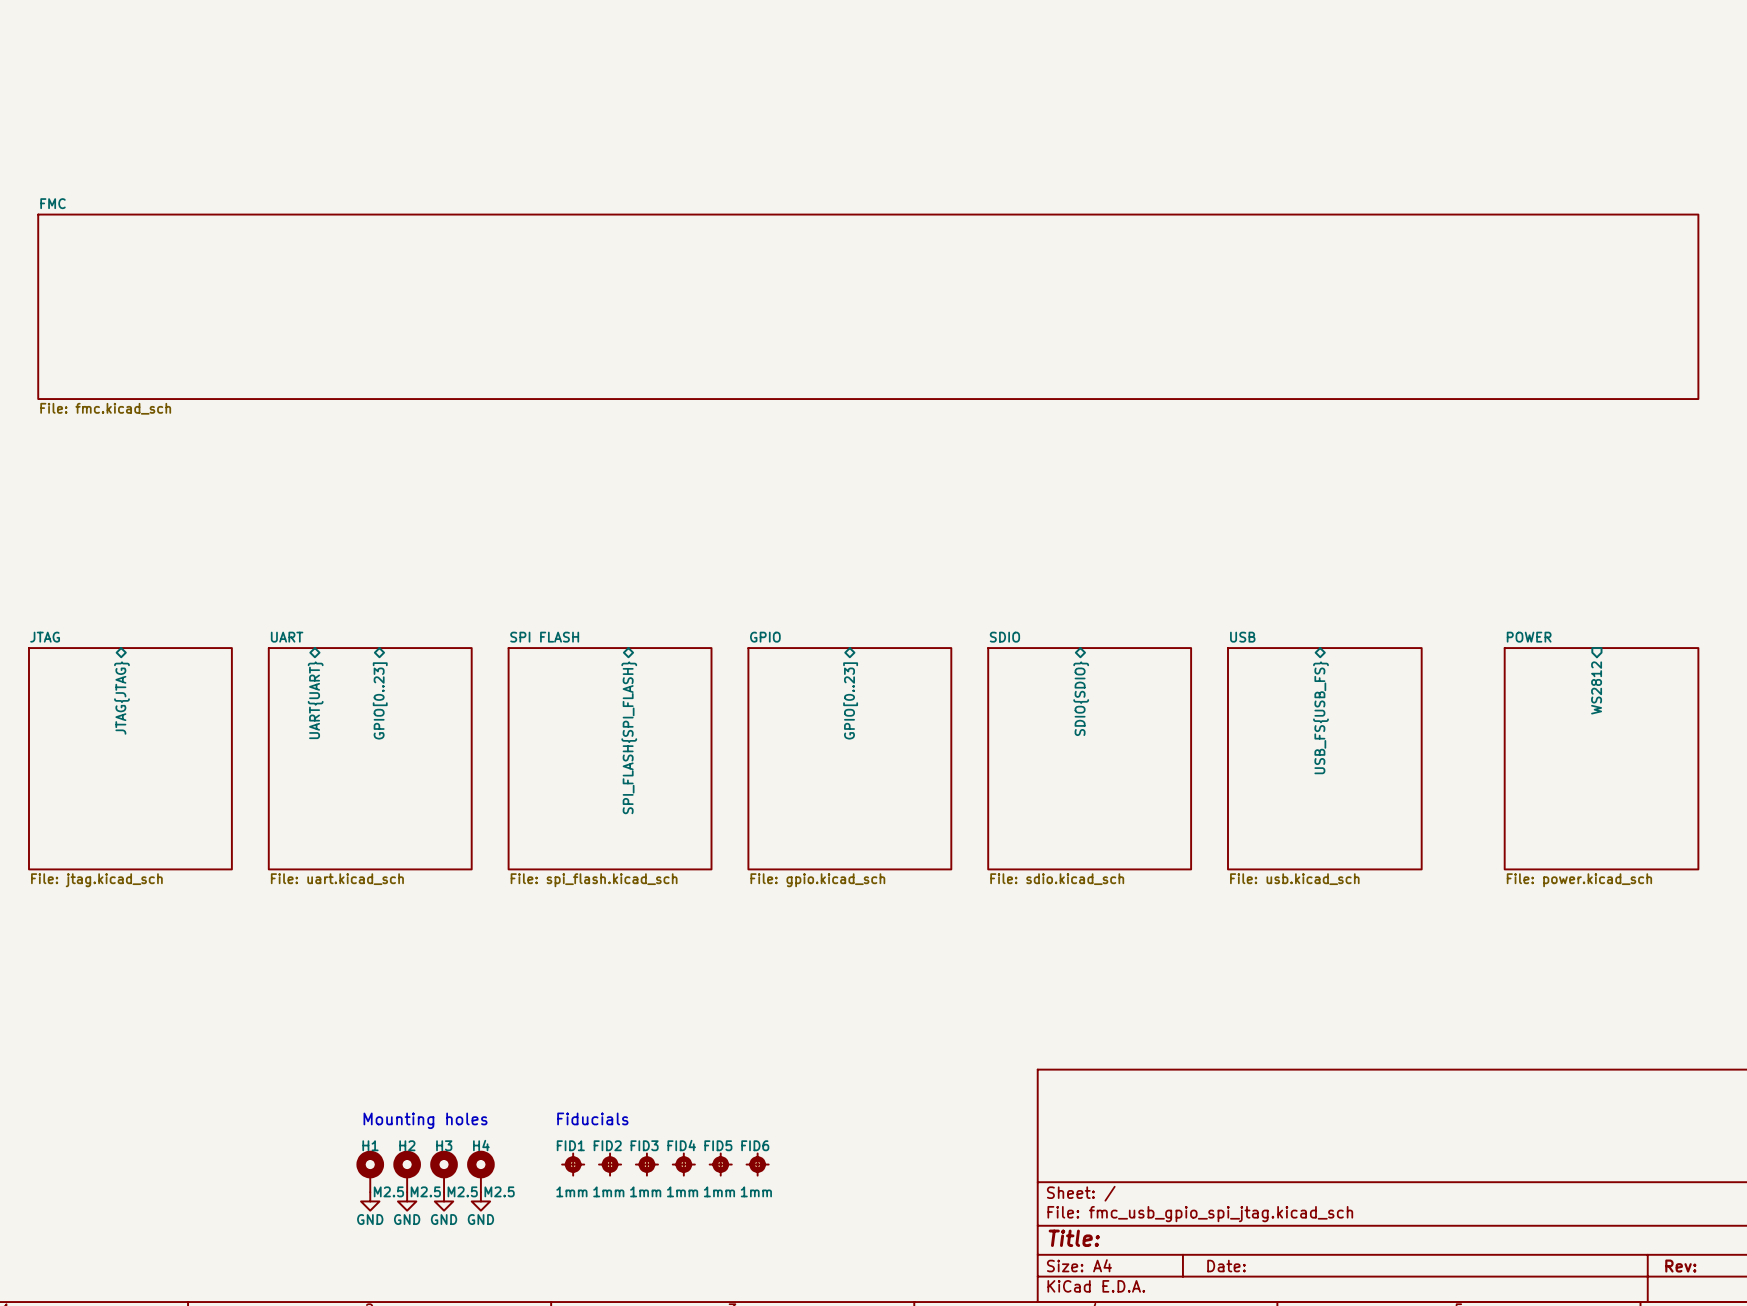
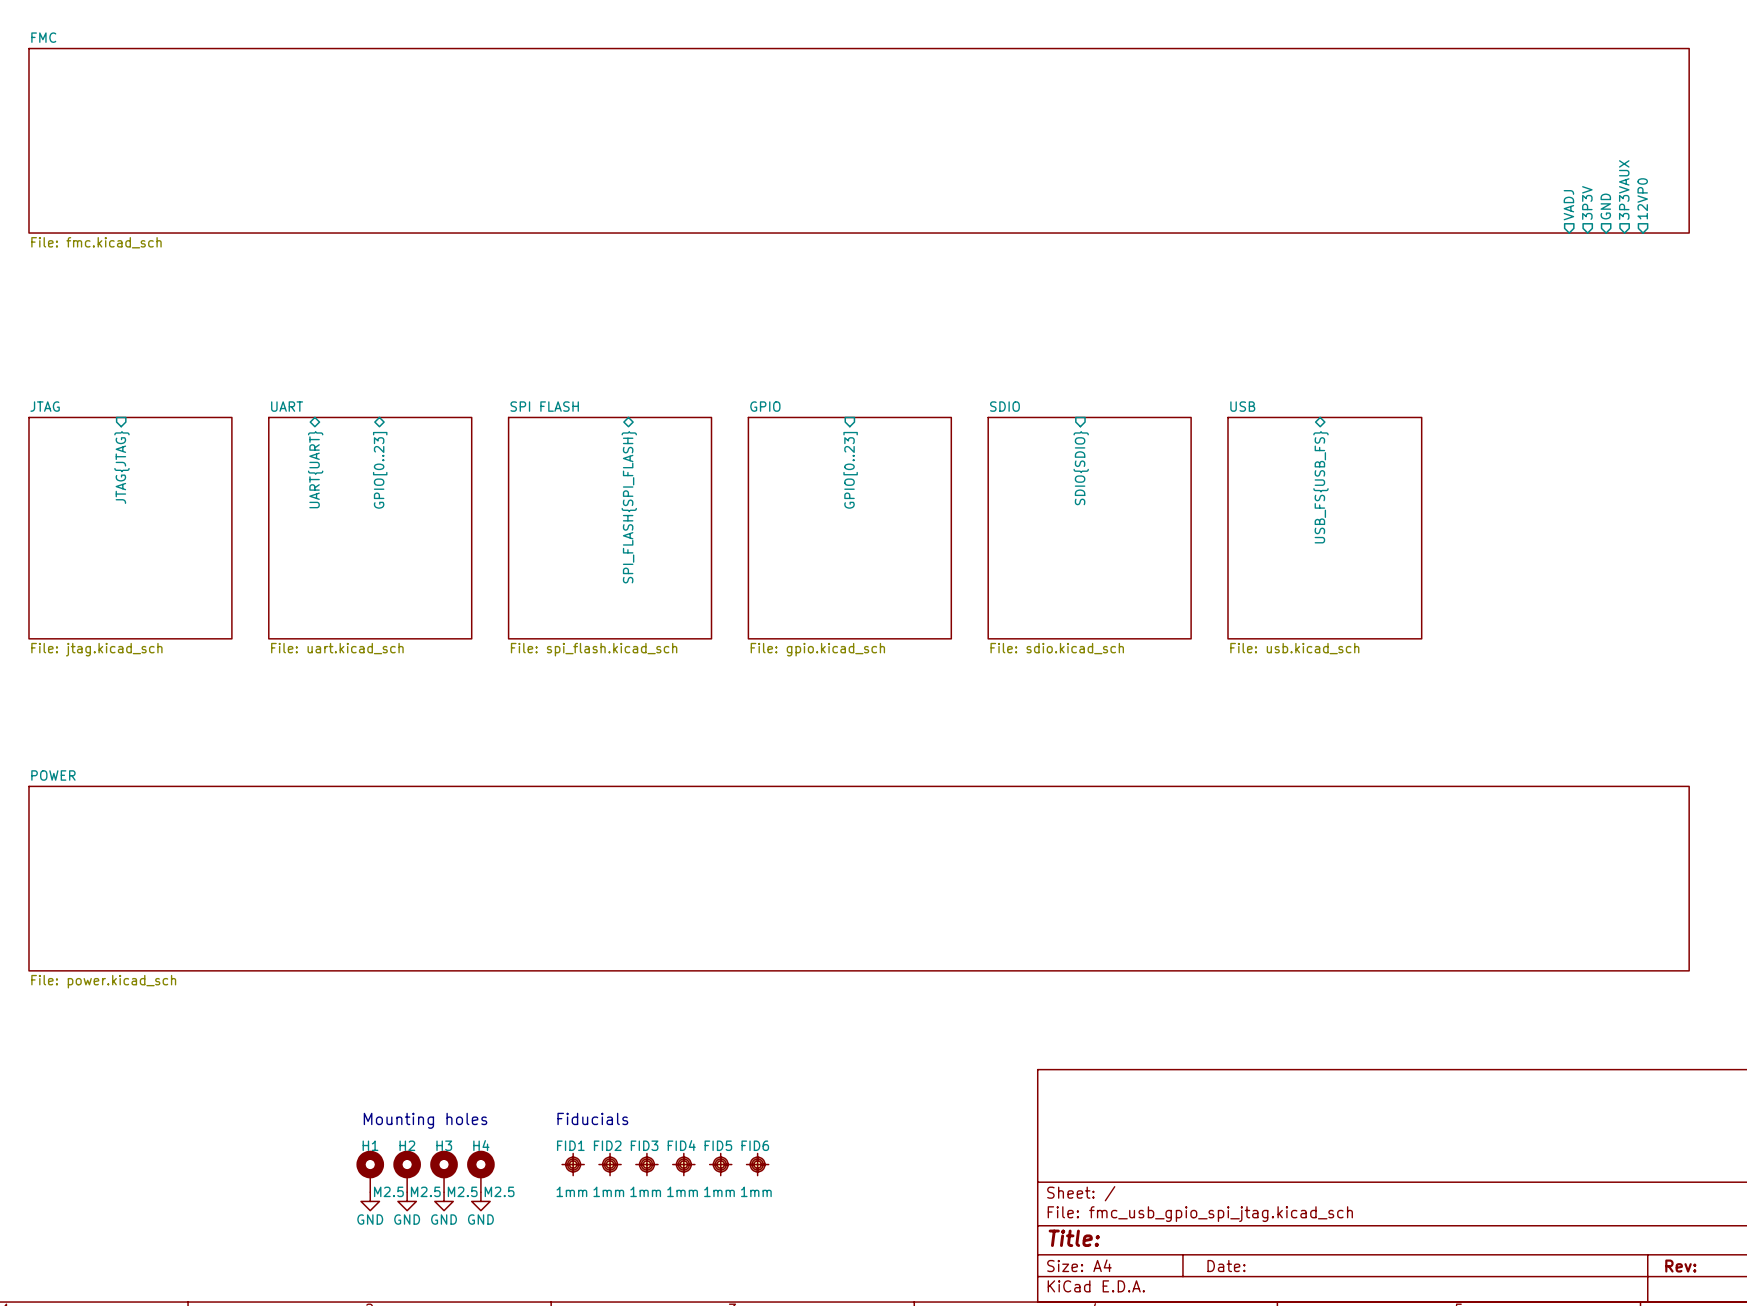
sheet pin: none -> 3P3VAUX (1624, 190)
sheet pin: none -> 12VP0 (1642, 198)
sheet pin: none -> 3P3V (1587, 203)
sheet pin: none -> VADJ (1568, 205)
sheet pin: none -> GND (1605, 206)
sheet FMC position: (868, 306) -> (859, 140)
sheet pin: none -> JTAG{JTAG} (121, 467)
sheet pin: none -> SDIO{SDIO} (1081, 468)
sheet pin: none -> UART{UART} (315, 469)
sheet pin: none -> GPIO[0..23] (380, 470)
sheet pin: none -> GPIO[0..23] (850, 470)
sheet pin: none -> USB_FS{USB_FS} (1320, 487)
sheet pin: none -> SPI_FLASH{SPI_FLASH} (629, 507)
sheet JTAG: none -> File: jtag.kicad_sch (130, 528)
sheet UART: none -> File: uart.kicad_sch (370, 528)
sheet SPI FLASH: none -> File: spi_flash.kicad_sch (610, 528)
sheet GPIO: none -> File: gpio.kicad_sch (849, 528)
sheet SDIO: none -> File: sdio.kicad_sch (1089, 528)
sheet USB: none -> File: usb.kicad_sch (1324, 528)
sheet pin: WS2812 (1596, 687) -> none
sheet pin: JTAG{JTAG} (121, 698) -> none
sheet pin: SDIO{SDIO} (1081, 698) -> none
sheet pin: UART{UART} (315, 700) -> none
sheet pin: GPIO[0..23] (380, 700) -> none
sheet pin: GPIO[0..23] (850, 700) -> none
sheet pin: USB_FS{USB_FS} (1320, 717) -> none
sheet pin: SPI_FLASH{SPI_FLASH} (629, 737) -> none
sheet JTAG: File: jtag.kicad_sch (130, 758) -> none
sheet UART: File: uart.kicad_sch (370, 758) -> none
sheet SPI FLASH: File: spi_flash.kicad_sch (610, 758) -> none
sheet GPIO: File: gpio.kicad_sch (849, 758) -> none
sheet SDIO: File: sdio.kicad_sch (1089, 758) -> none
sheet USB: File: usb.kicad_sch (1324, 758) -> none
sheet POWER: File: power.kicad_sch (1601, 758) -> none
sheet POWER: none -> File: power.kicad_sch (859, 878)

